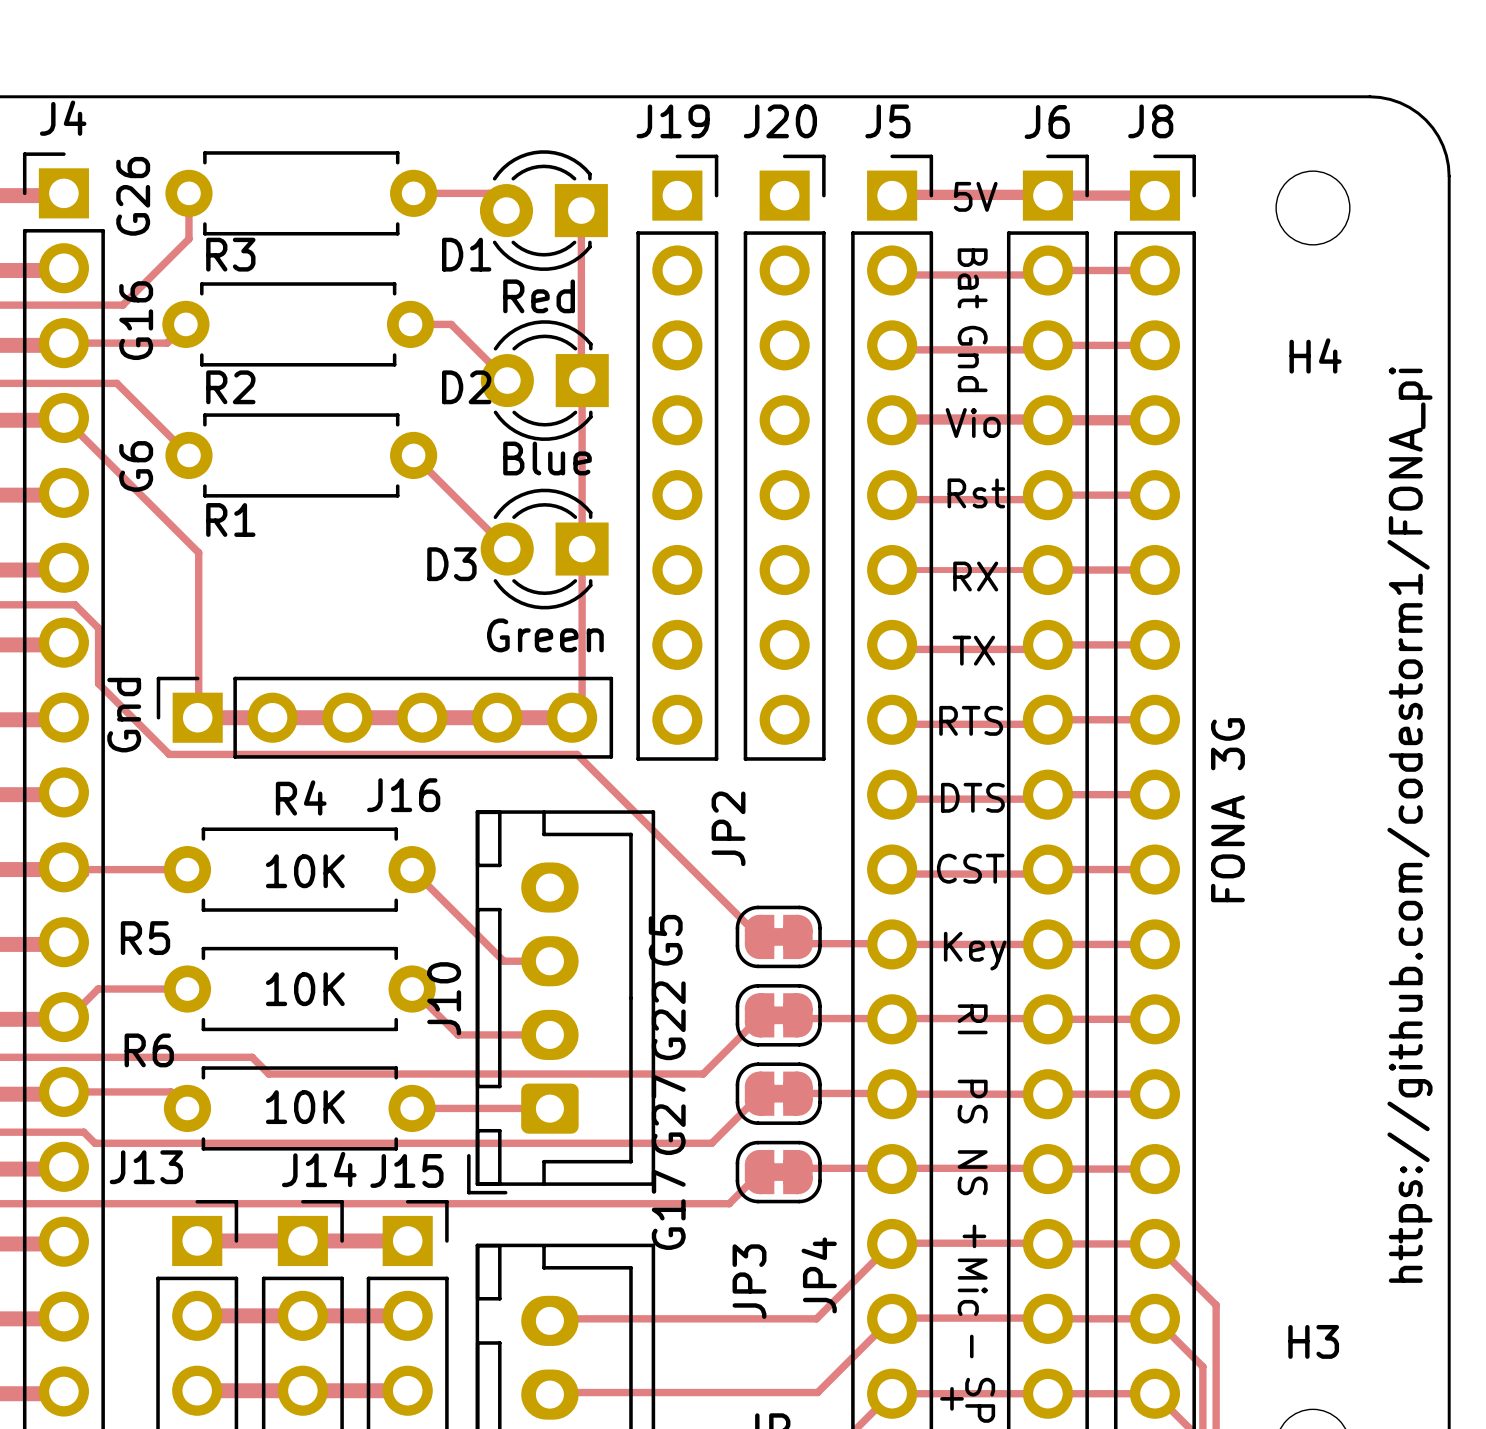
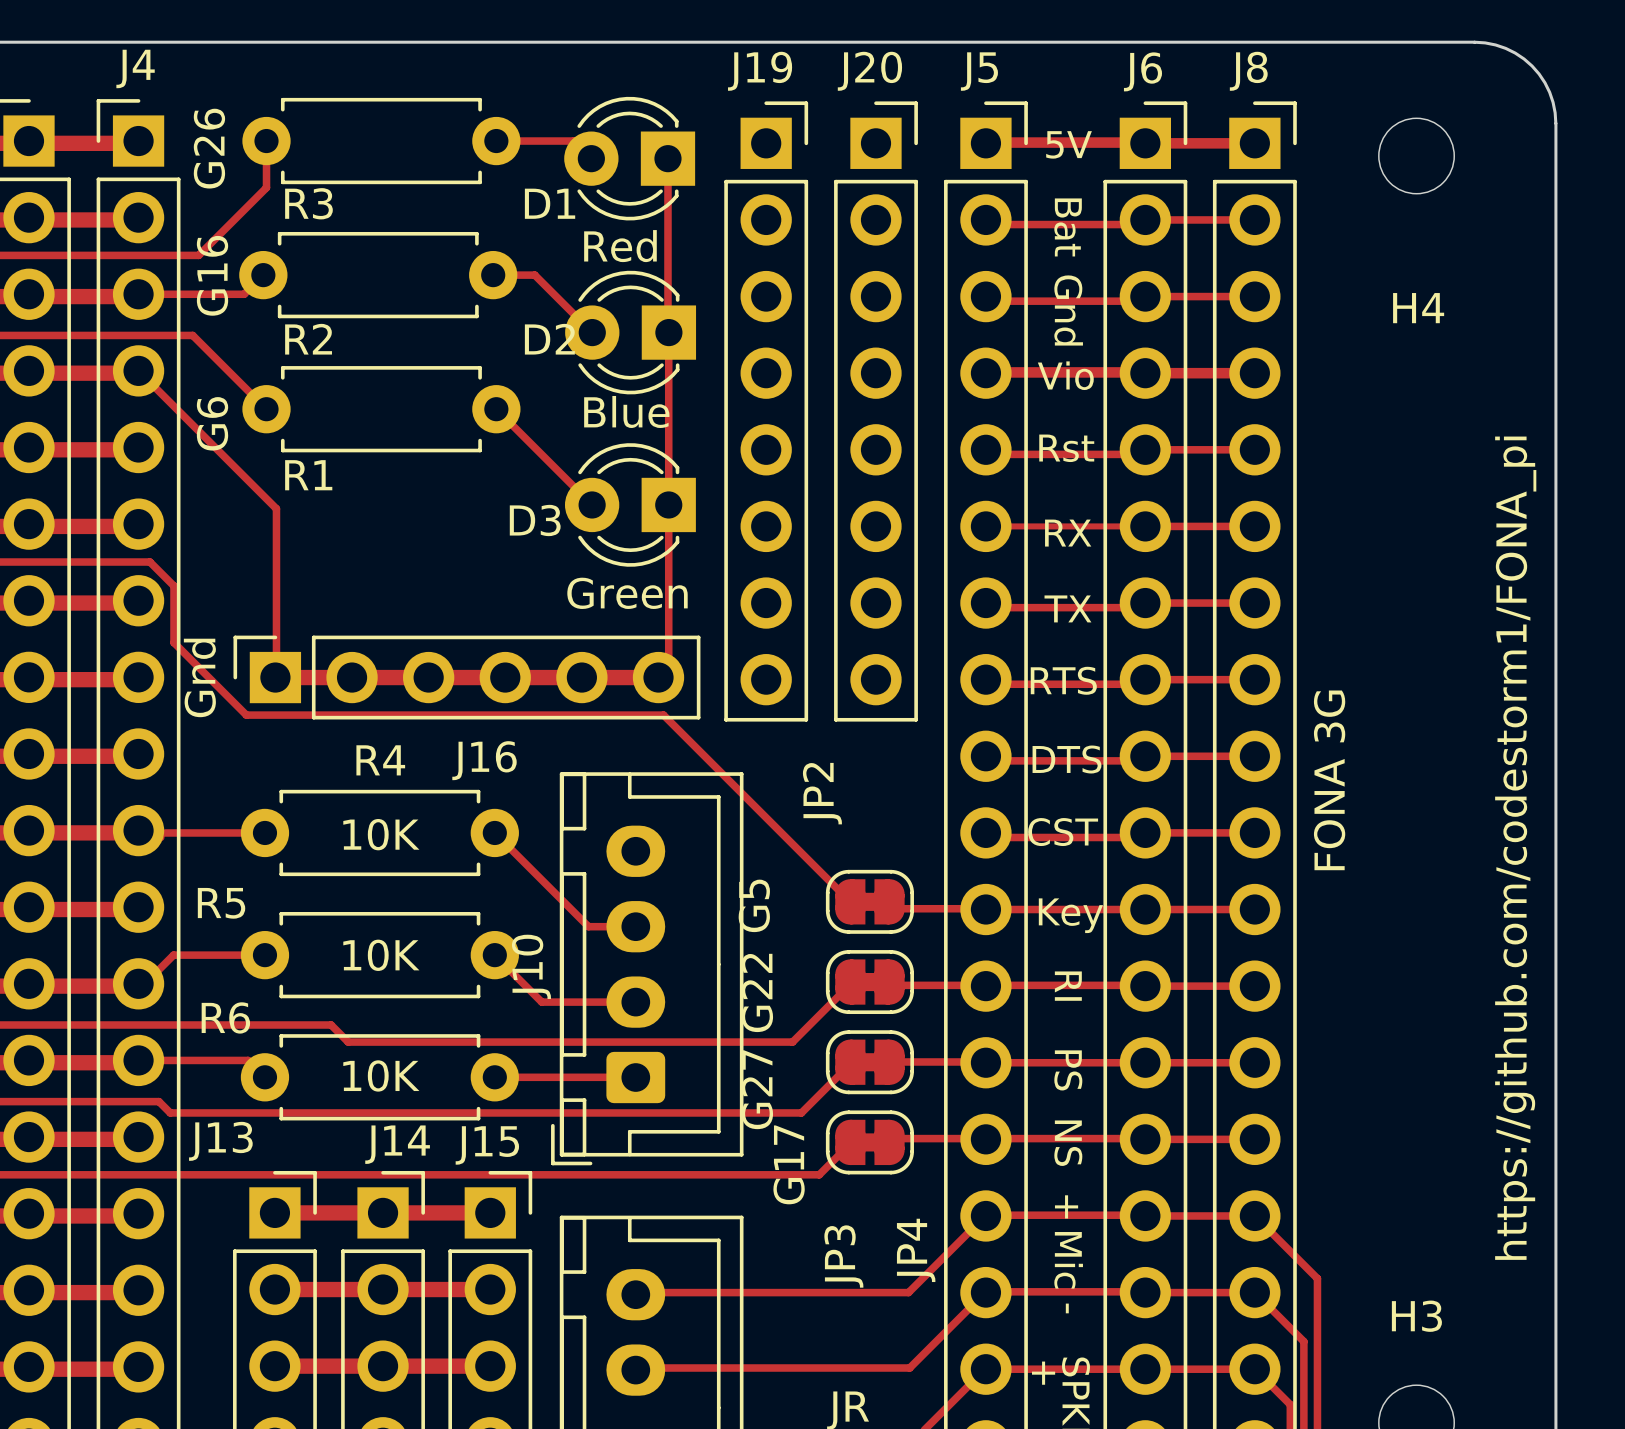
text position: G17 (668, 1209) -> G17 (789, 1164)

